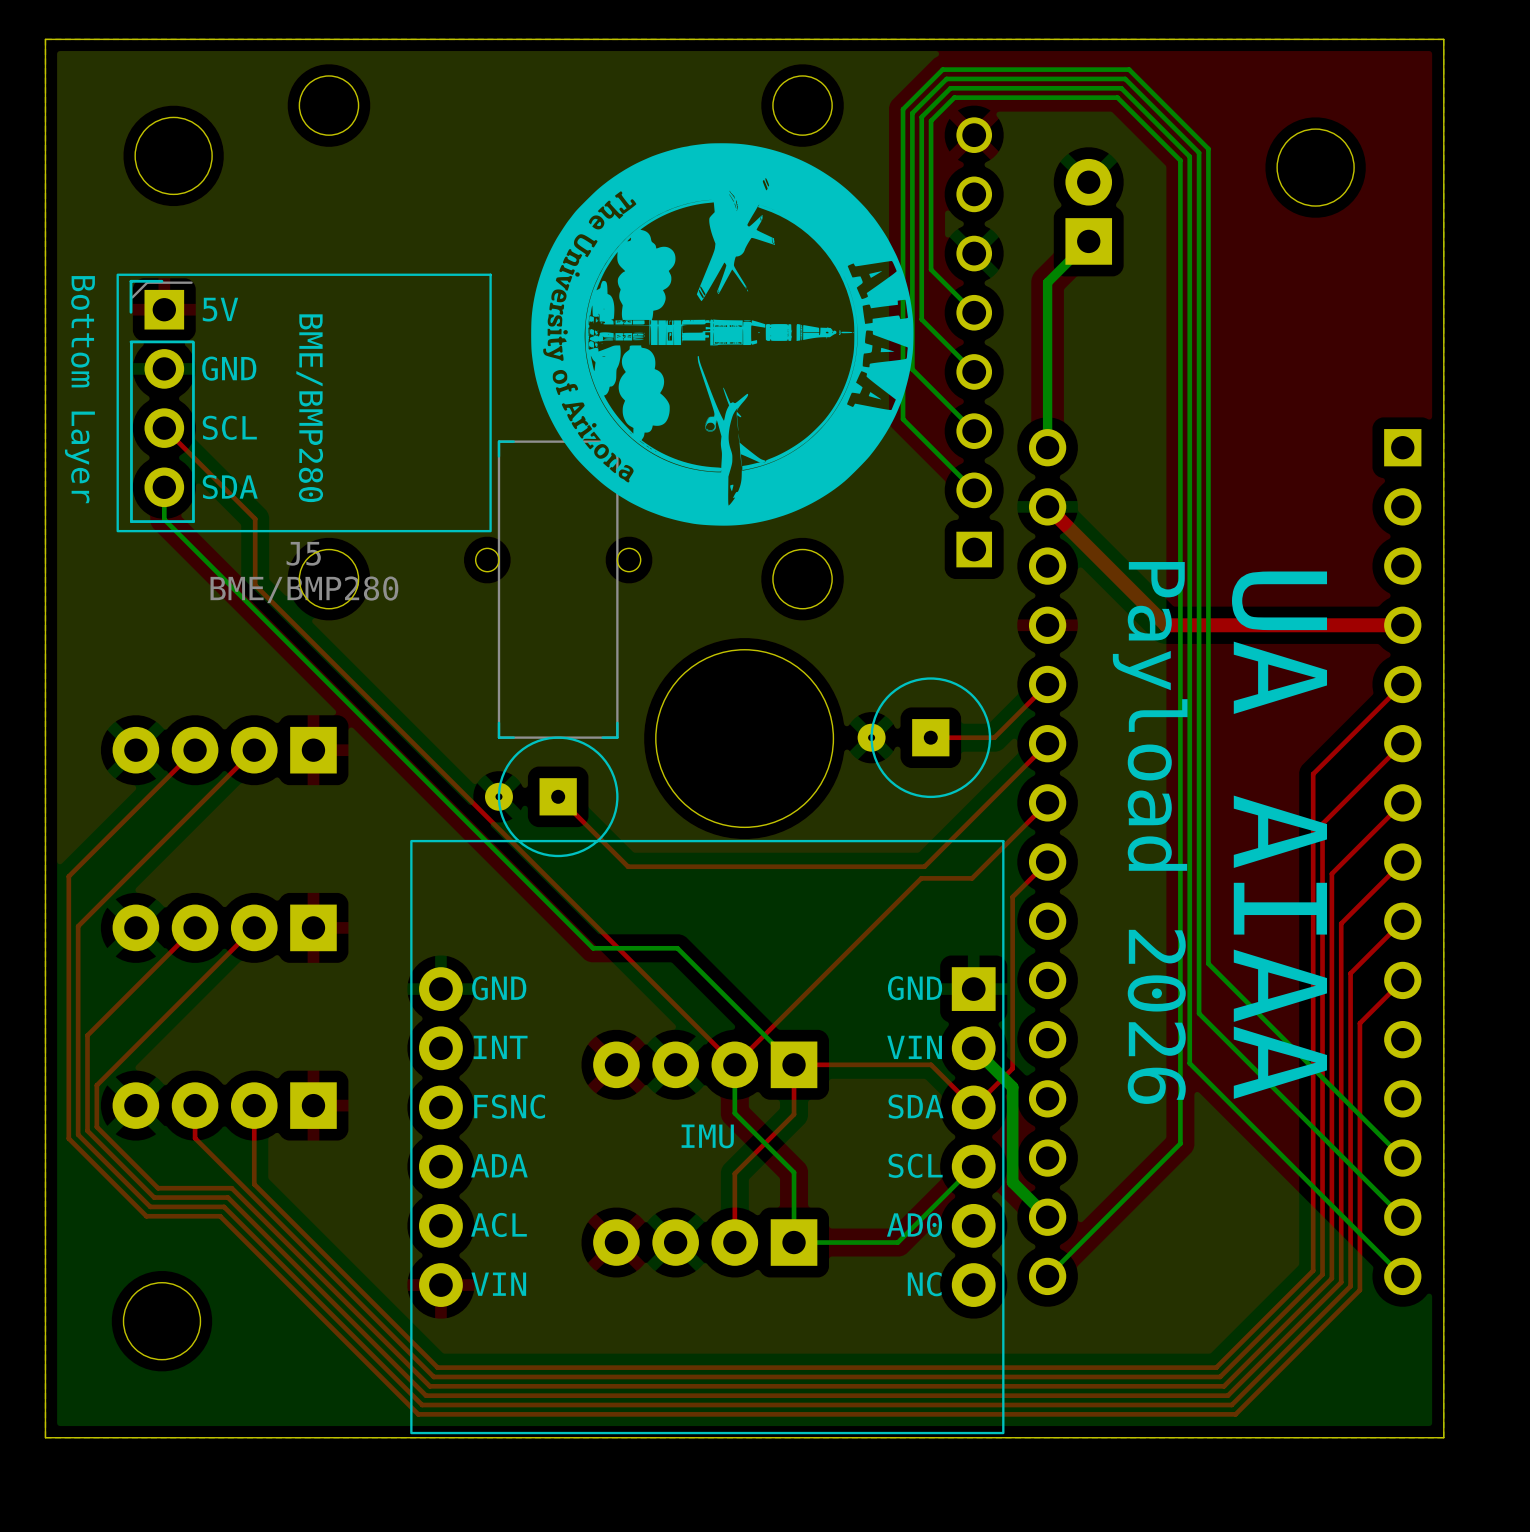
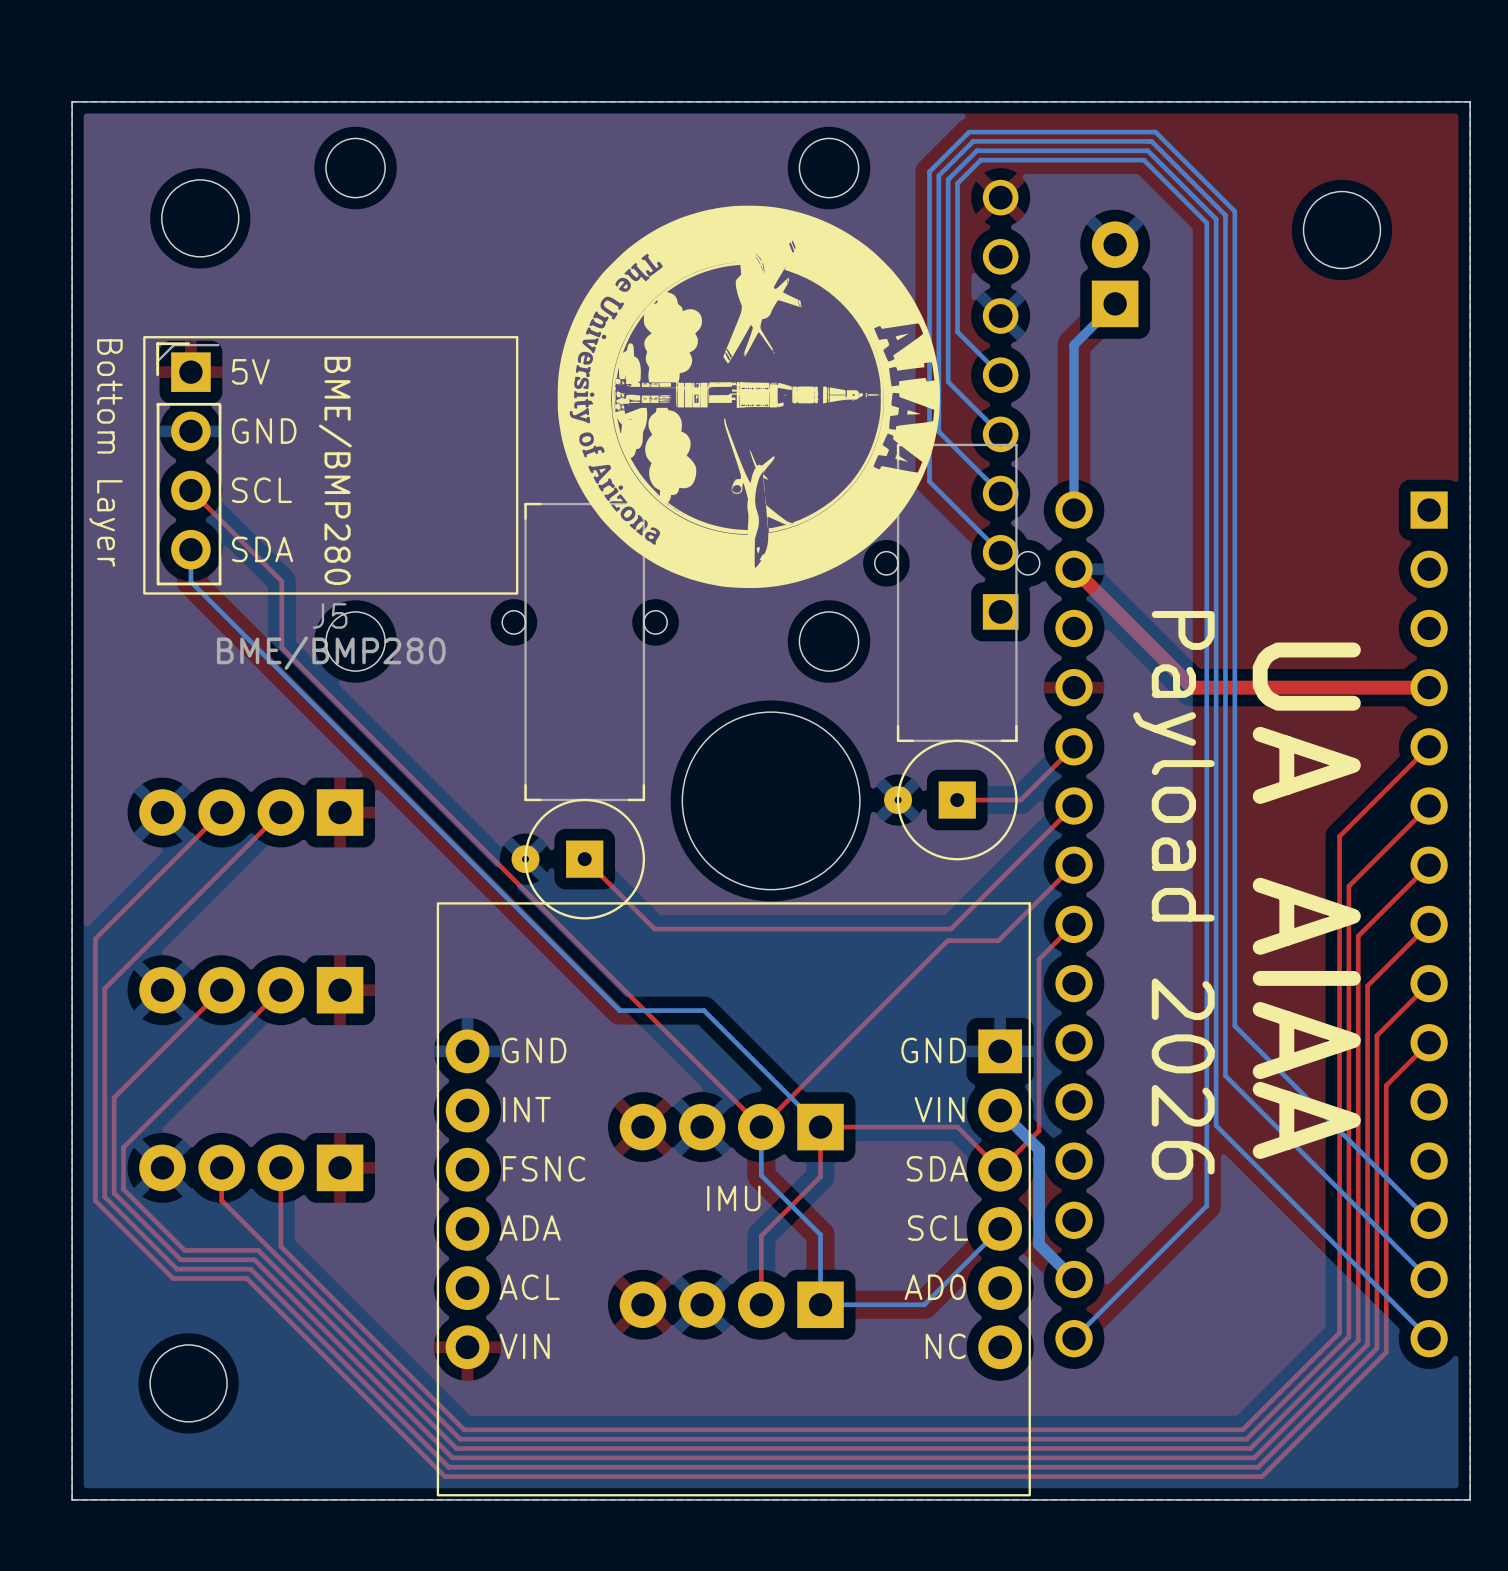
part: none -> (957, 652)
part: (924, 737) -> none

